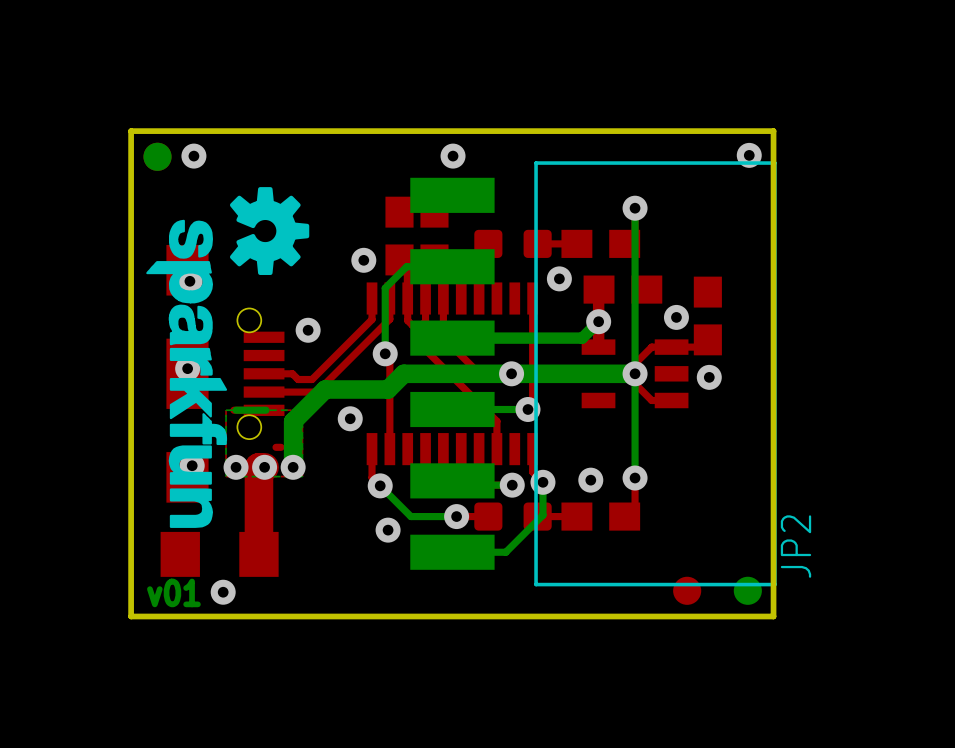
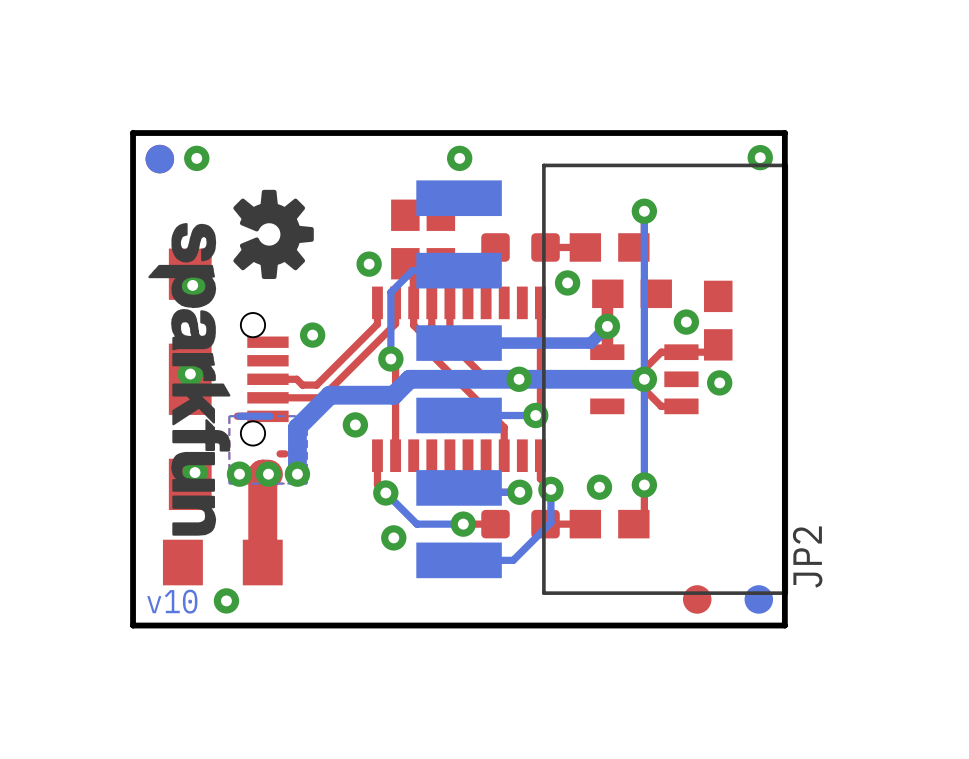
text: v01 (173, 592) -> v10 (172, 601)

